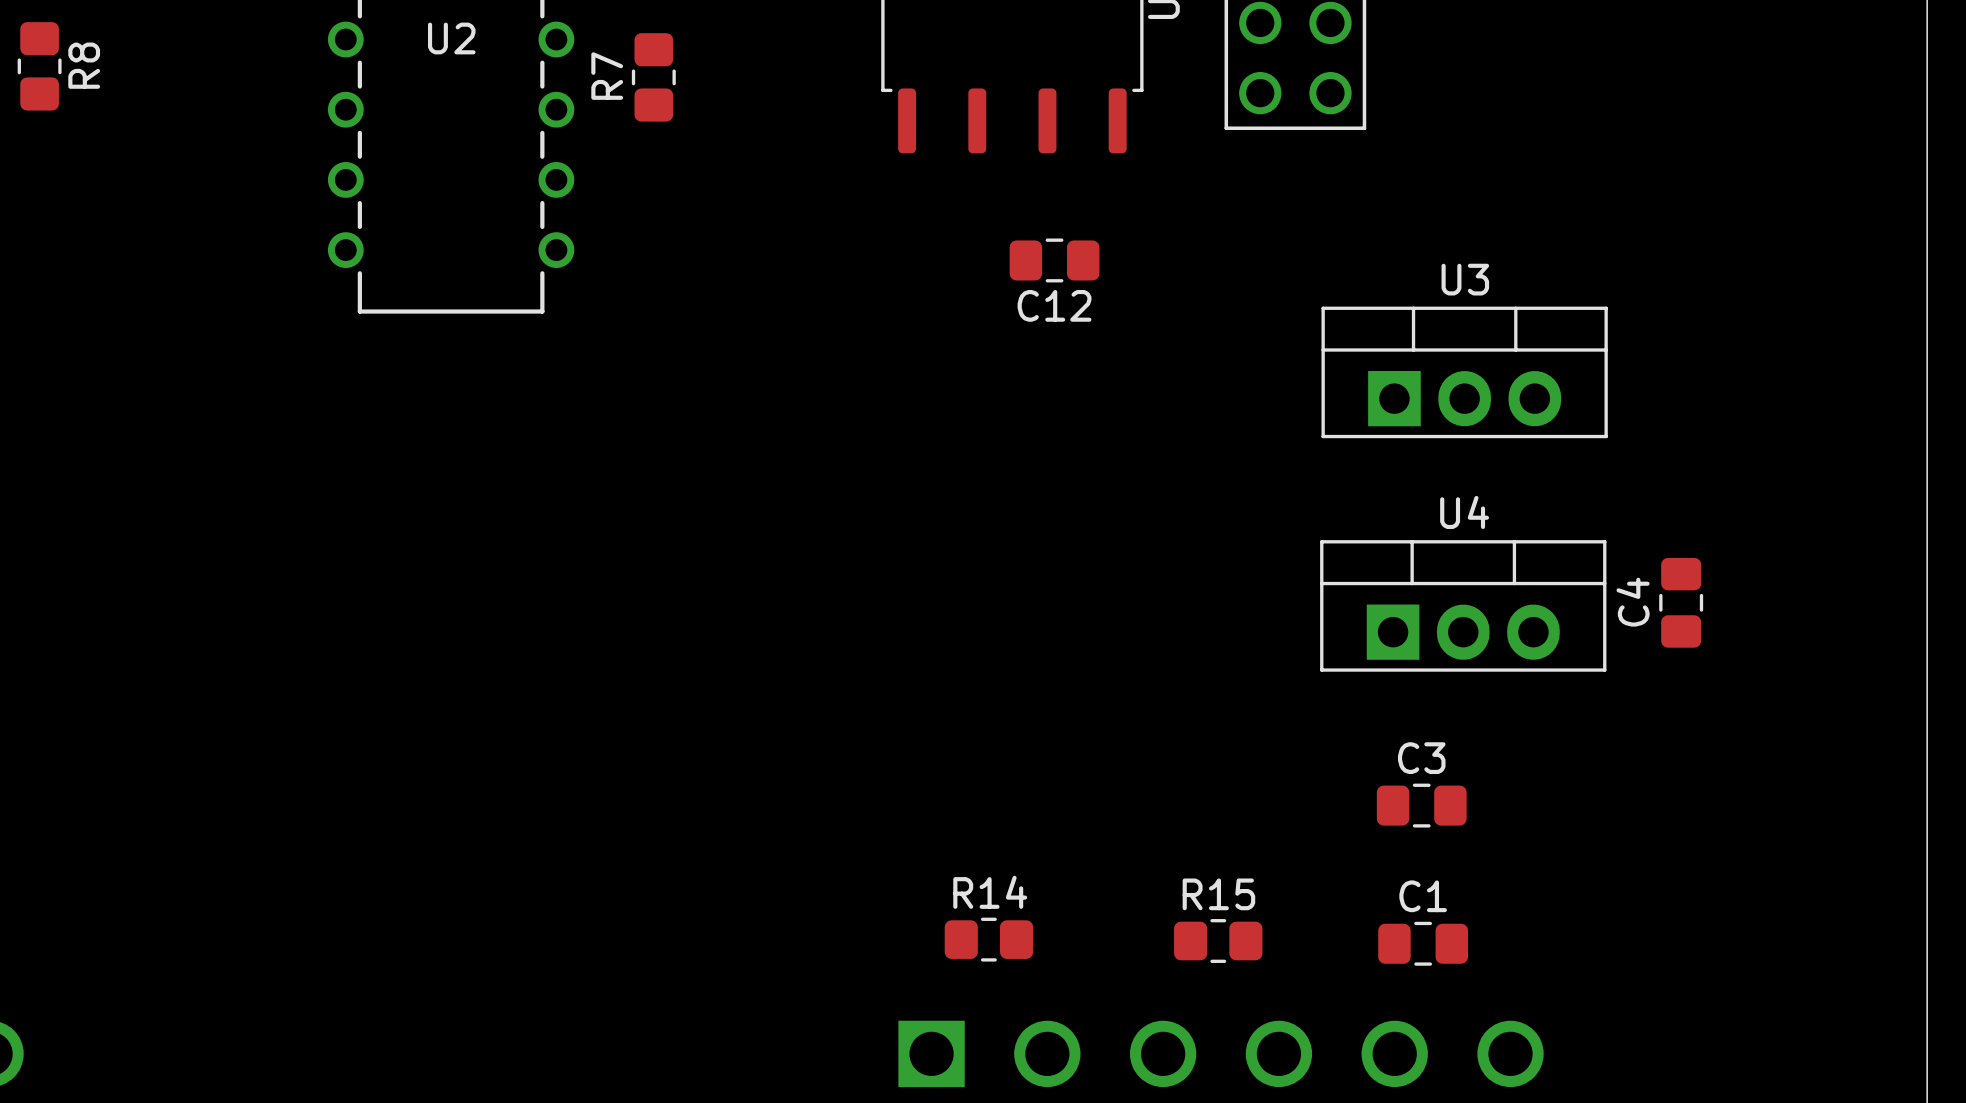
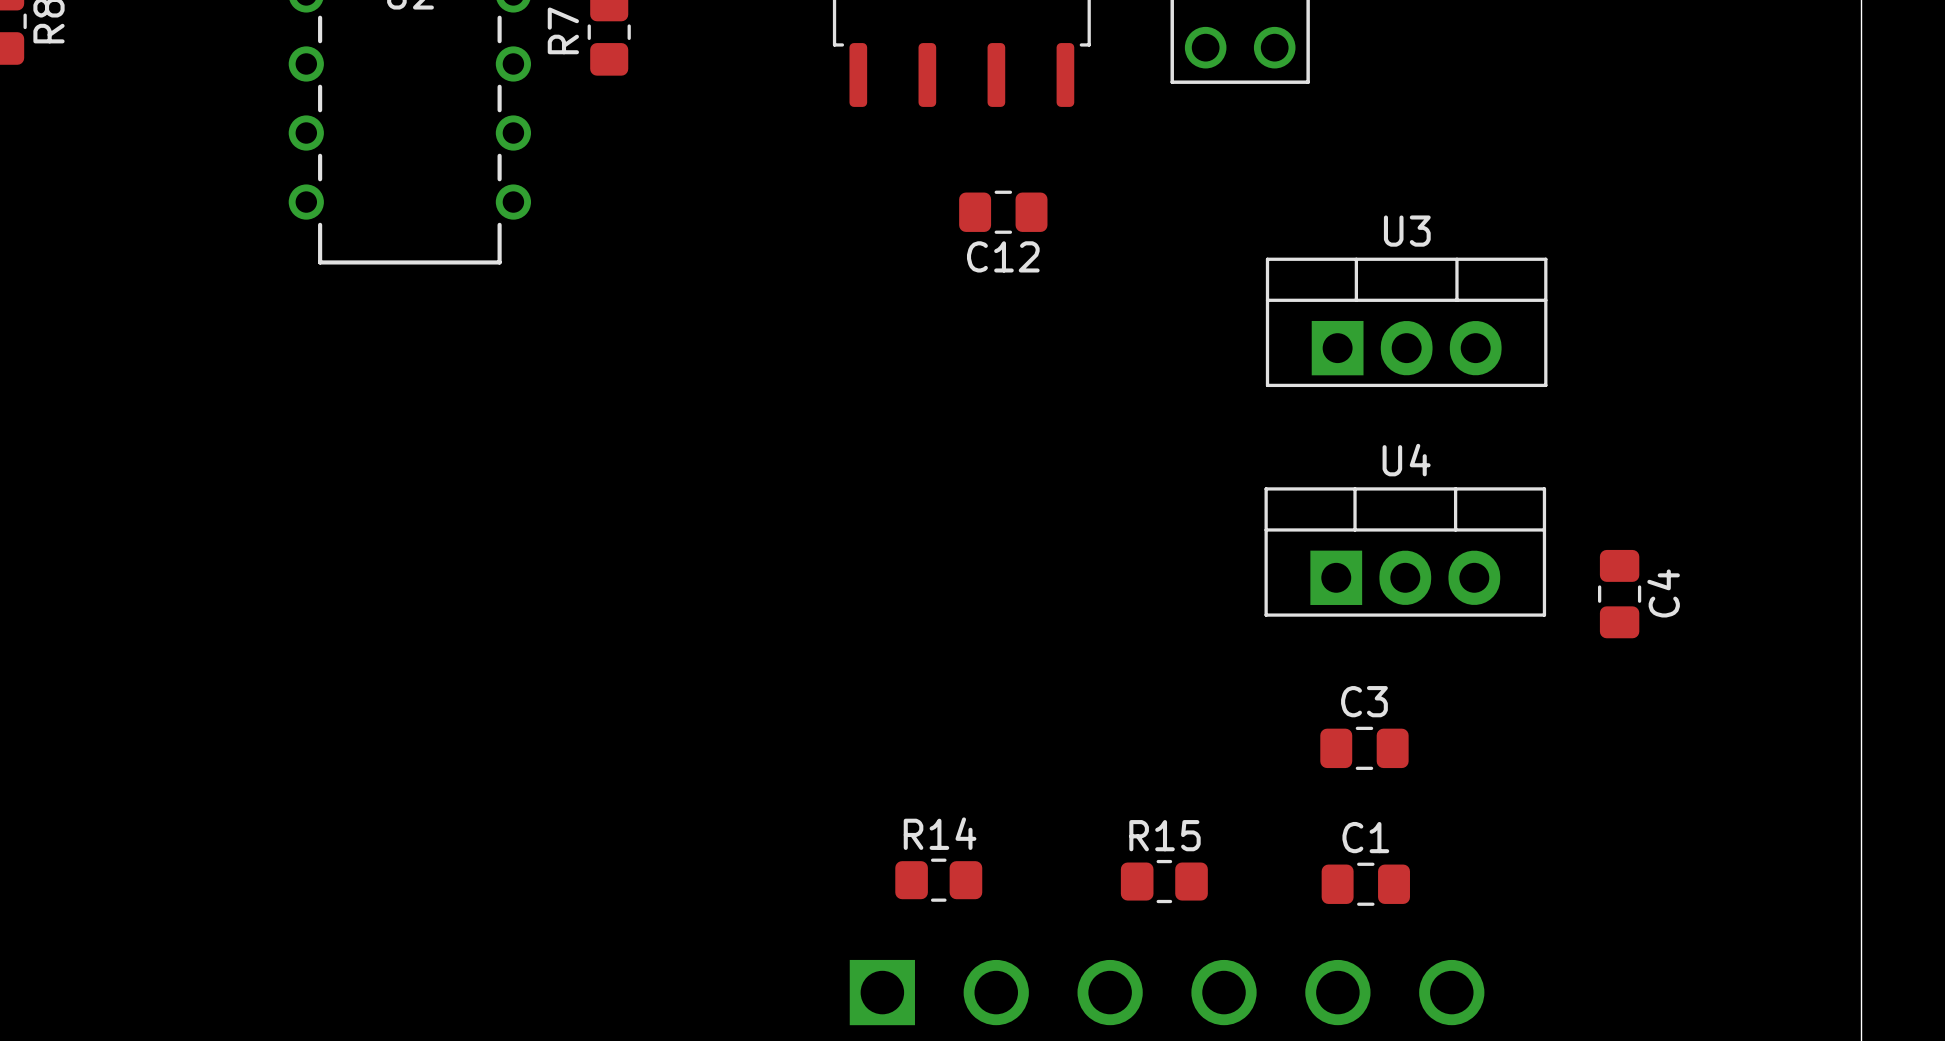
C4 name position: C4 (1633, 602) -> C4 (1663, 593)
C4 position: (1681, 602) -> (1619, 594)

